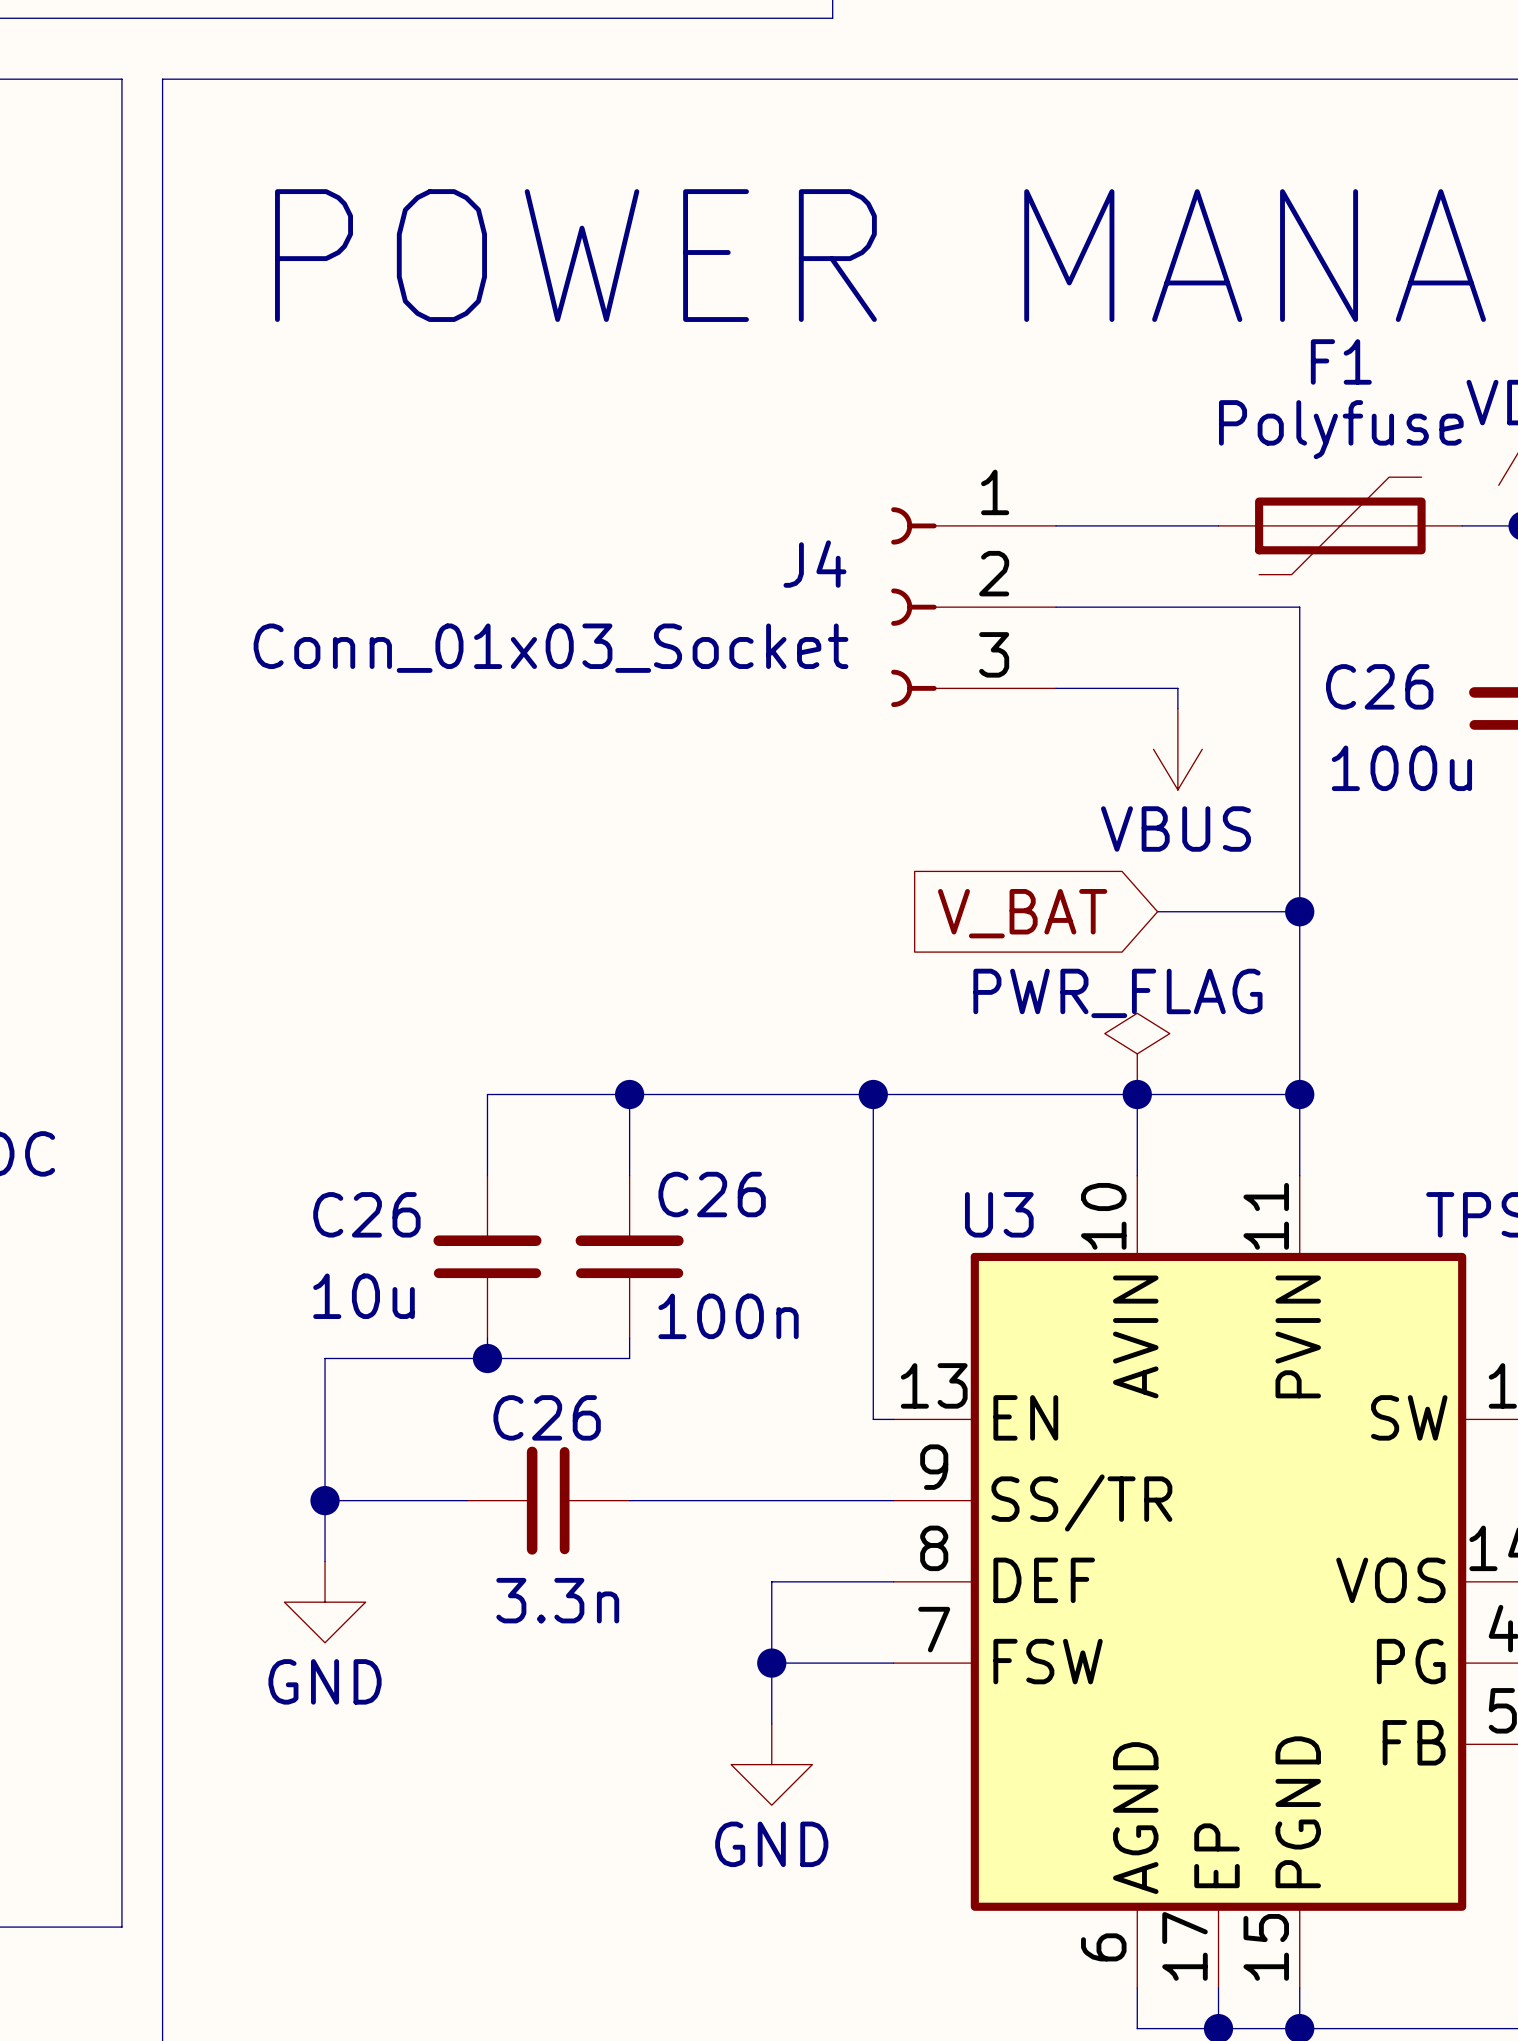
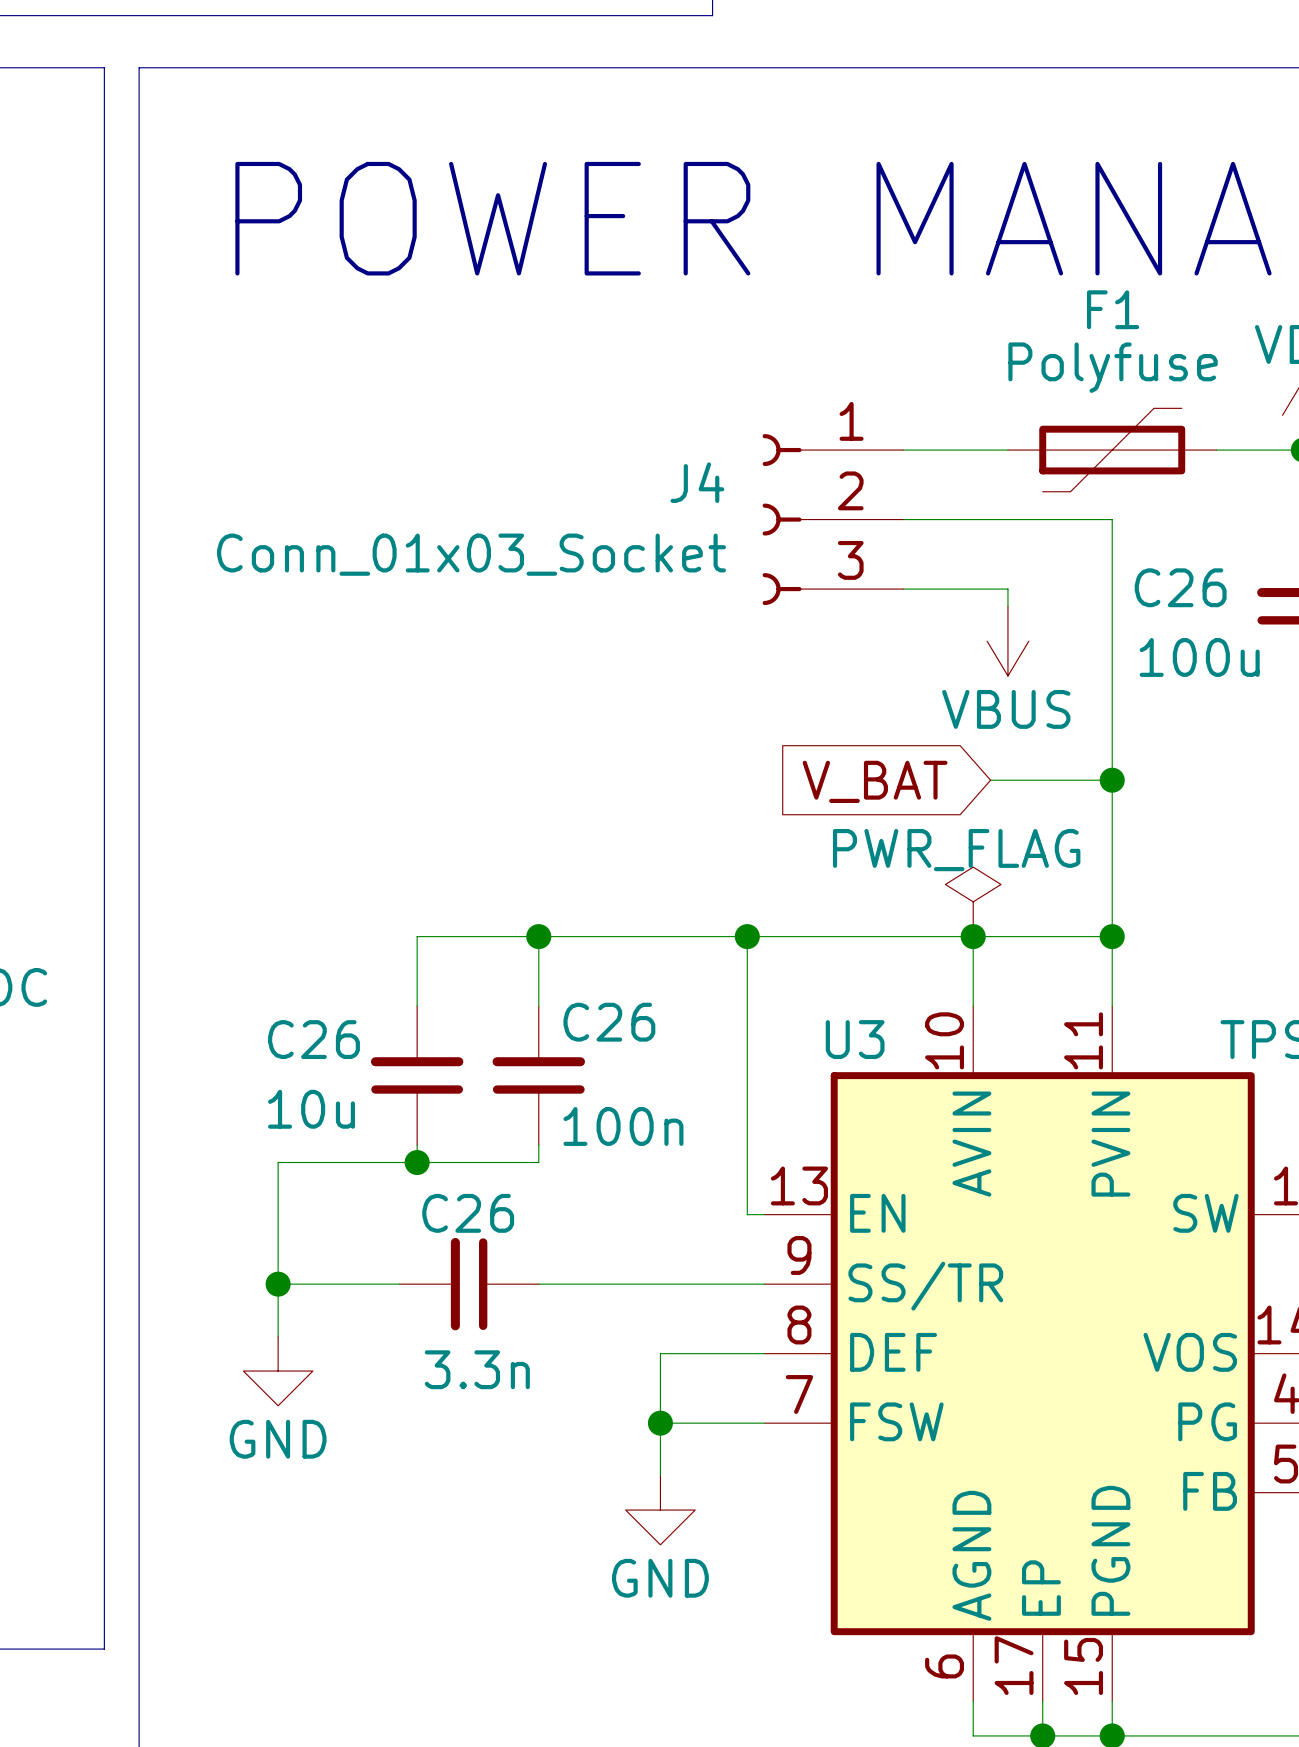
F1 position: (1340, 525) -> (1112, 450)

